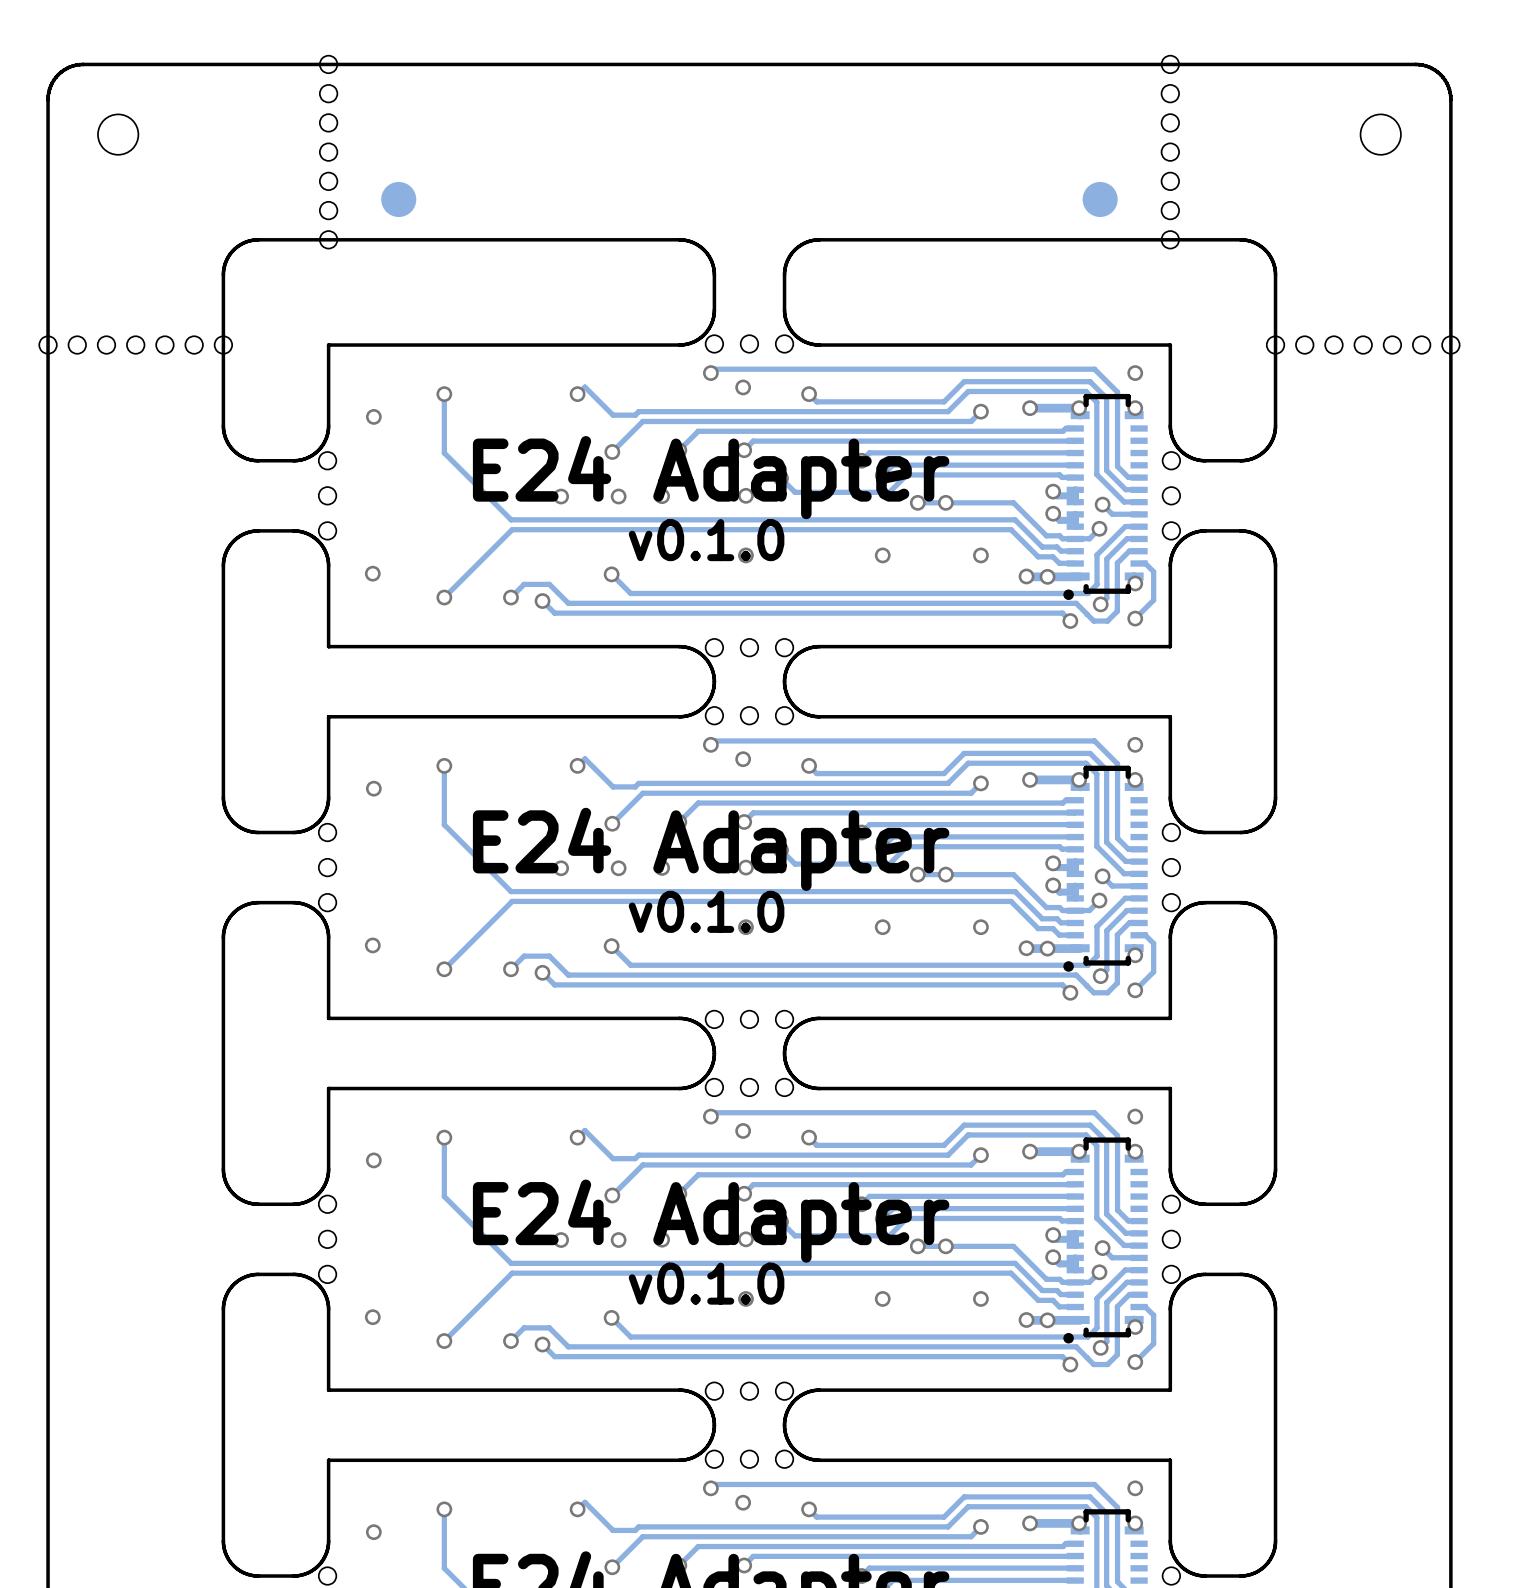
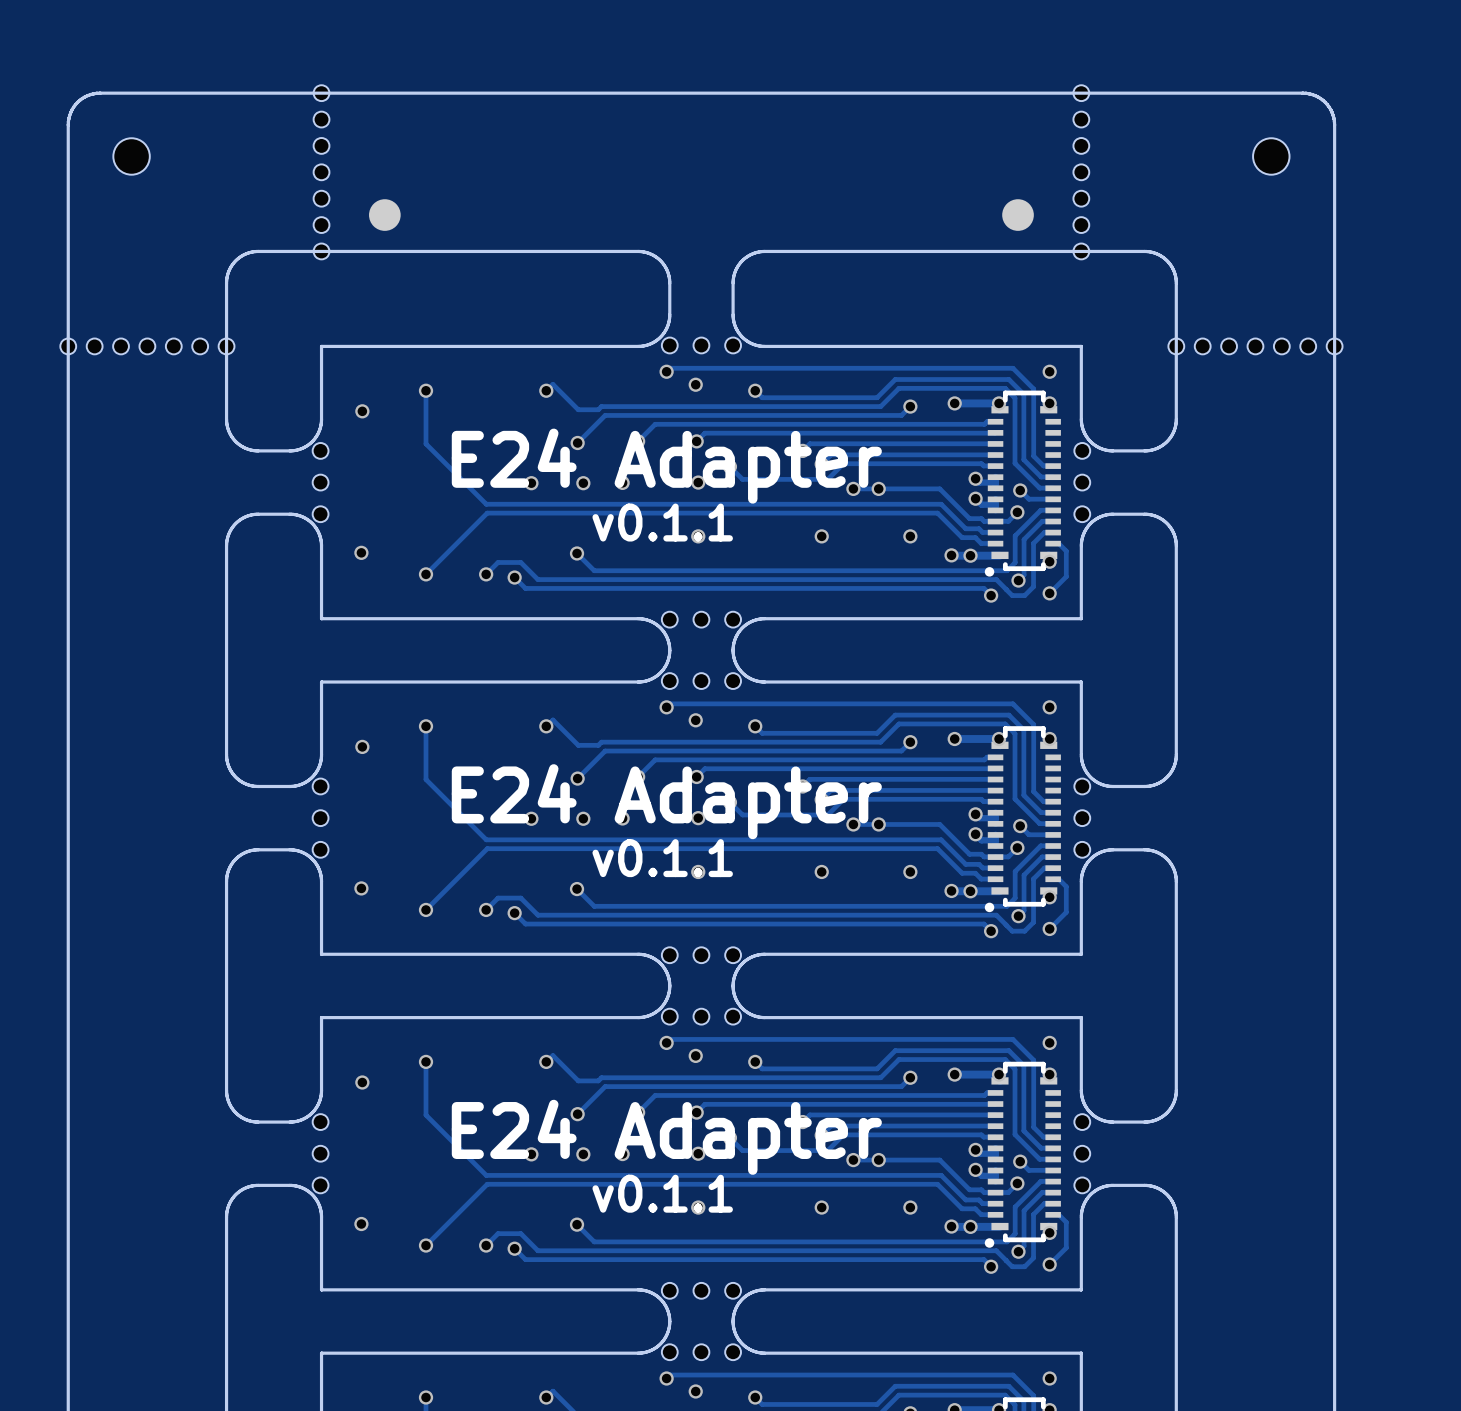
text: v0.1.0 (706, 540) -> v0.1.1 (662, 522)
text: v0.1.0 (706, 911) -> v0.1.1 (662, 858)
text: v0.1.0 (706, 1283) -> v0.1.1 (662, 1193)

